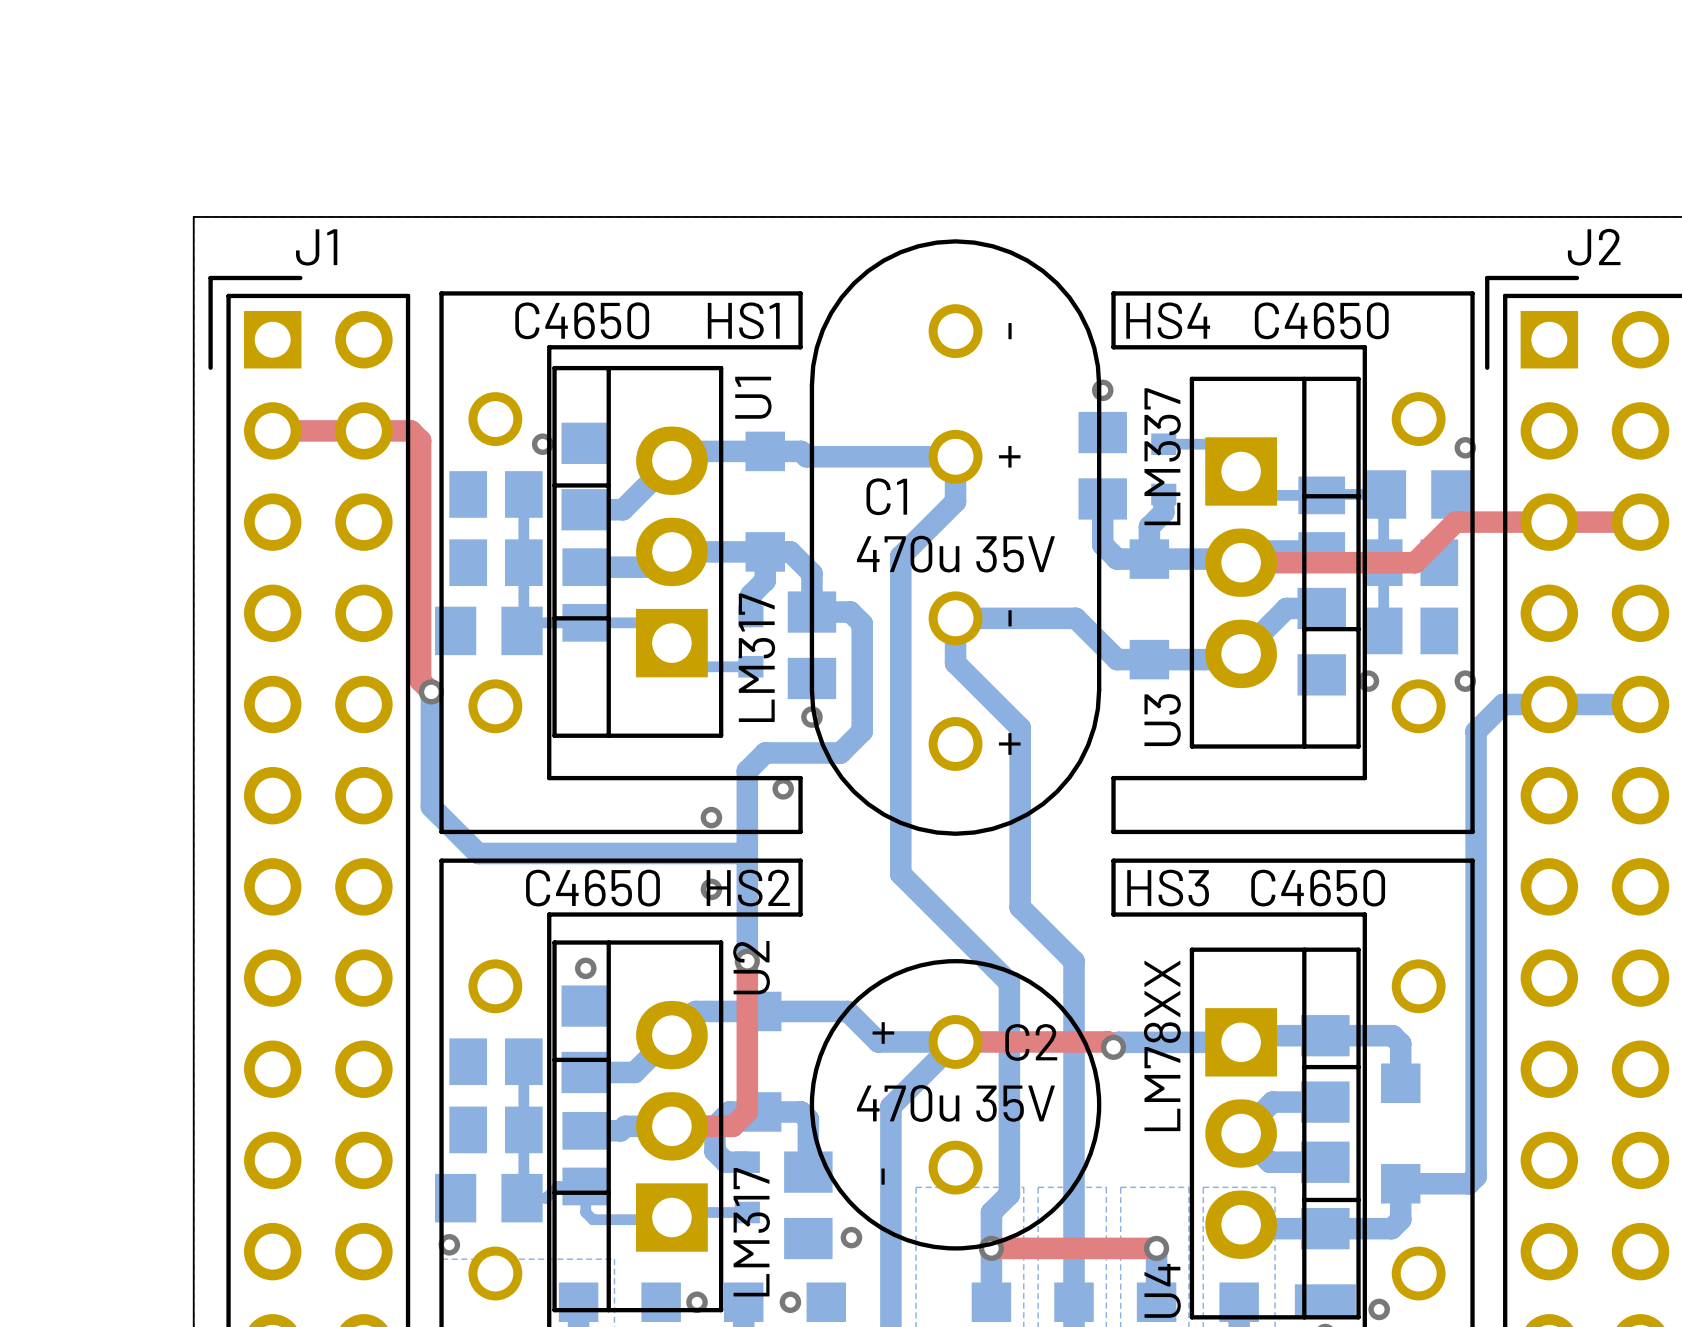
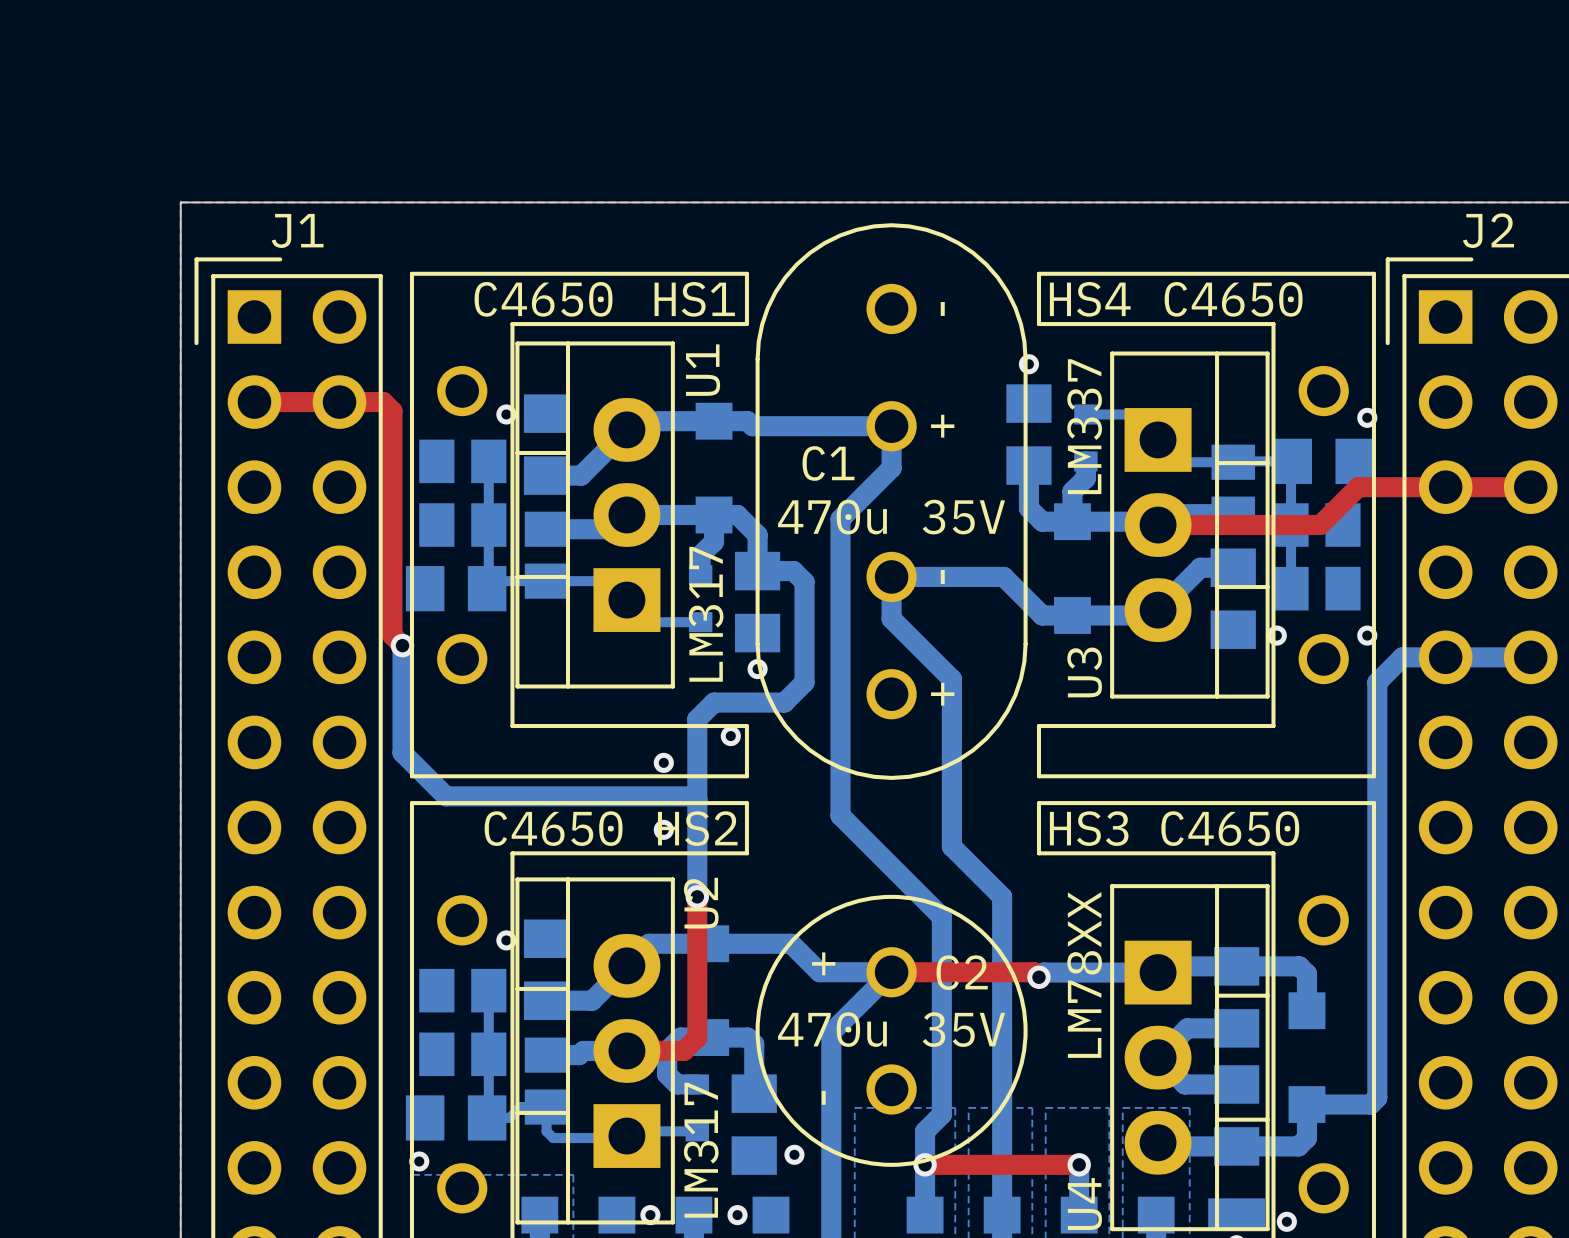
via position: (585, 968) -> (506, 940)

